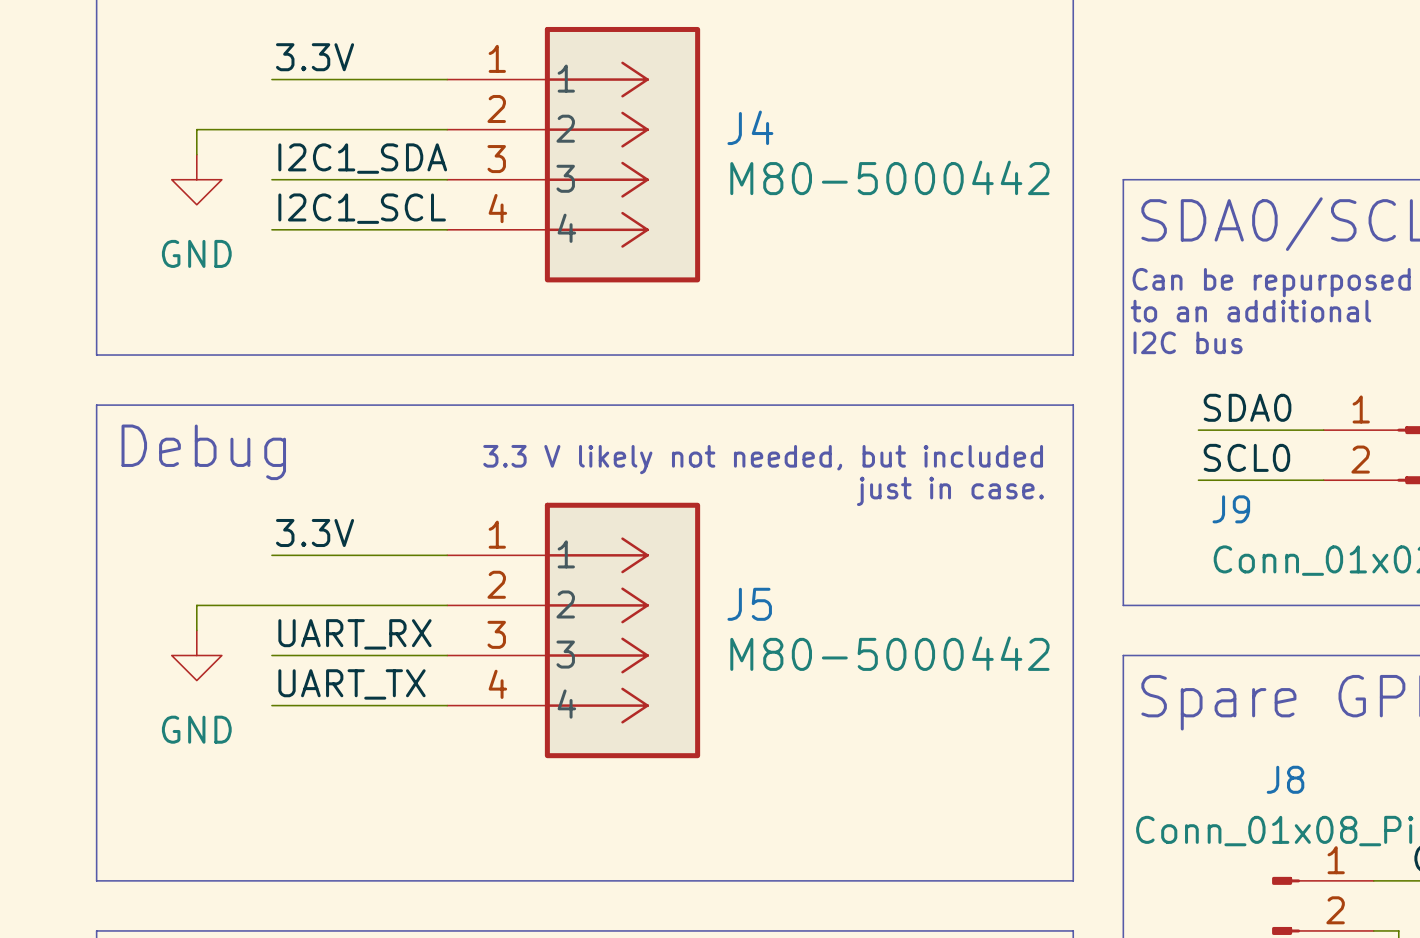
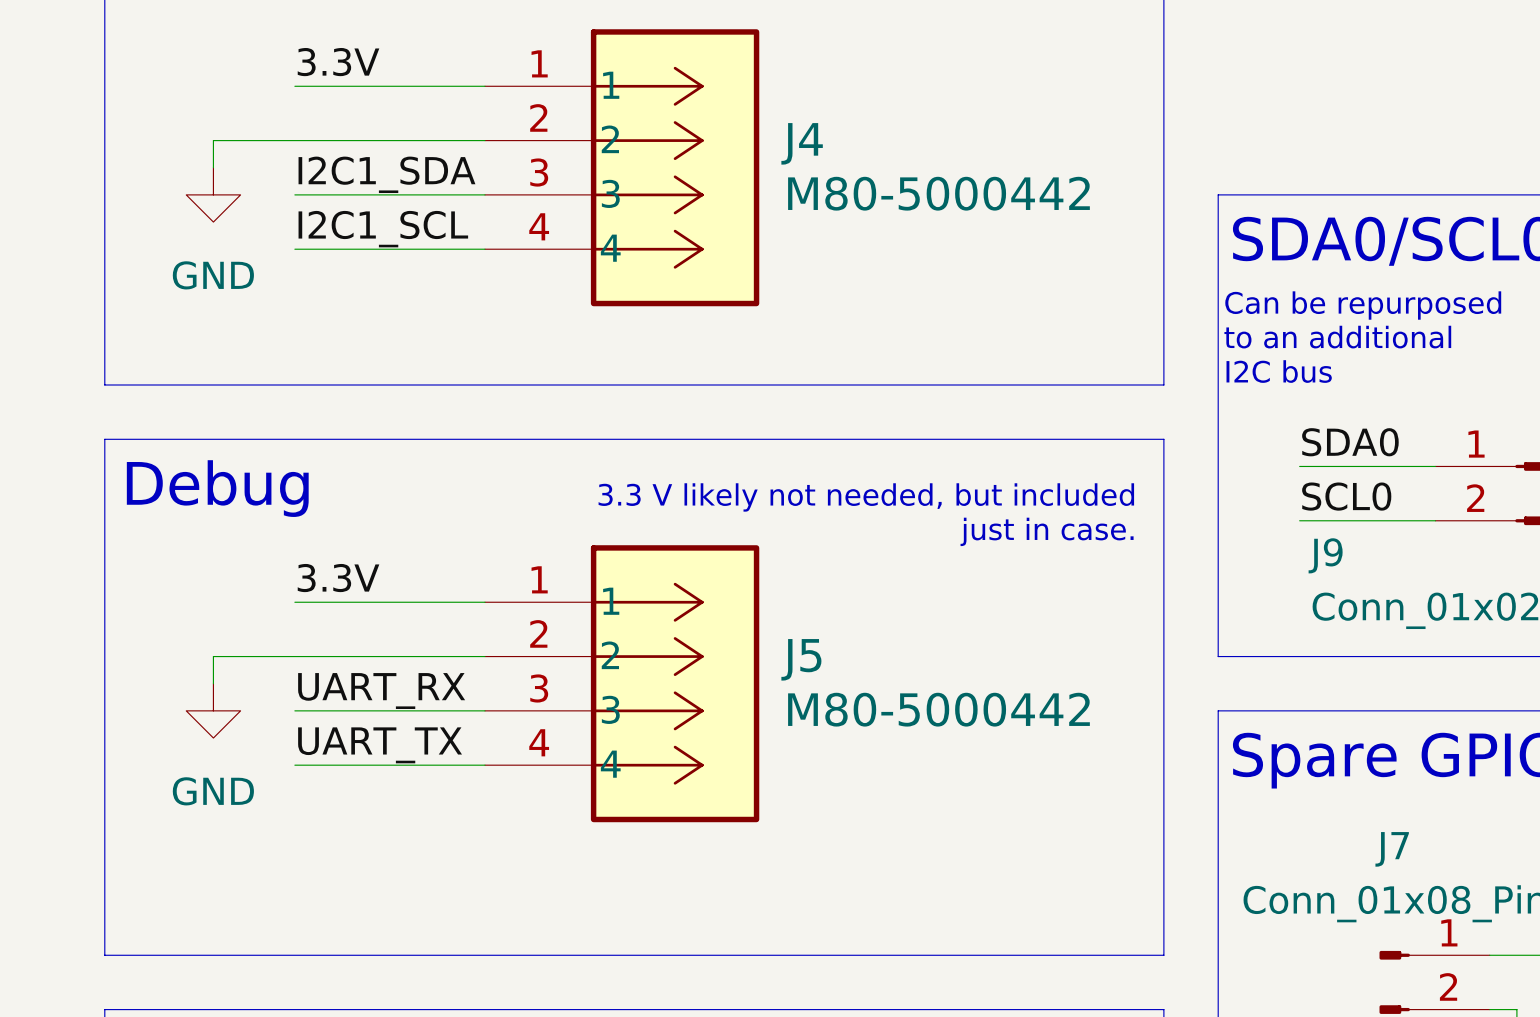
J8 name: J8 (1285, 779) -> J7 (1392, 849)

